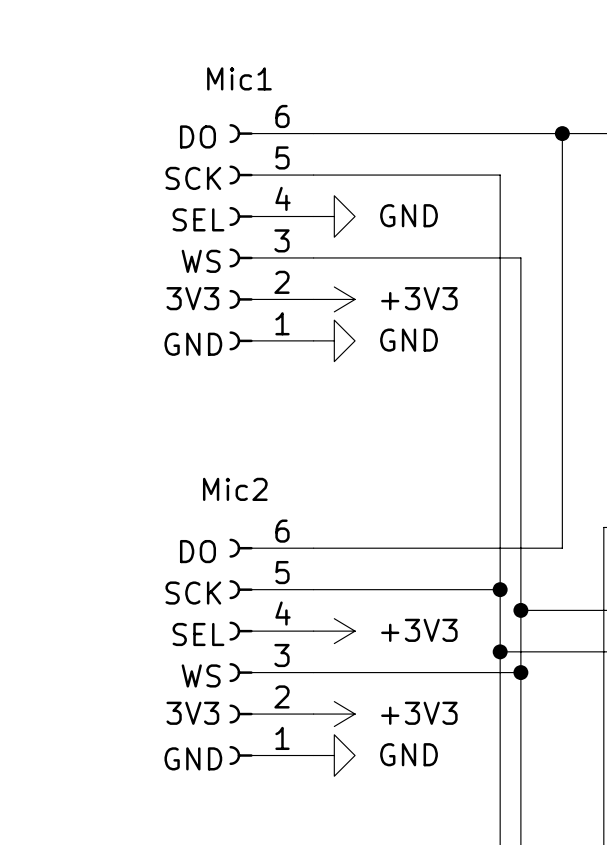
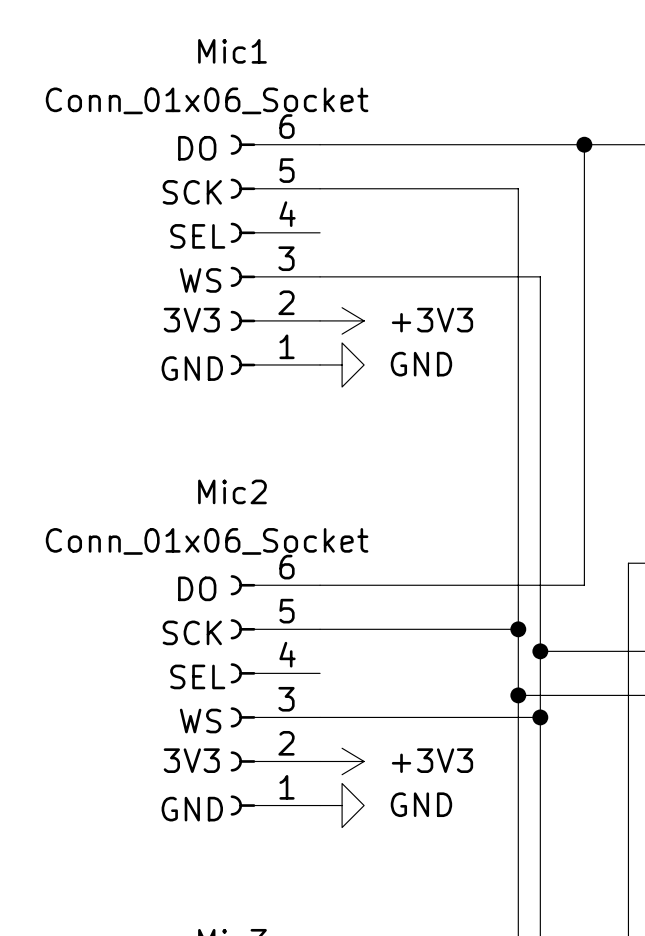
Mic1 name position: Mic1 (239, 78) -> Mic1 (232, 51)
Mic1 value: none -> Conn_01x06_Socket (207, 100)
power symbol: GND (334, 216) -> none
Mic2 name position: Mic2 (235, 489) -> Mic2 (232, 491)
Mic2 value: none -> Conn_01x06_Socket (207, 541)
power symbol: +3V3 (334, 631) -> none

